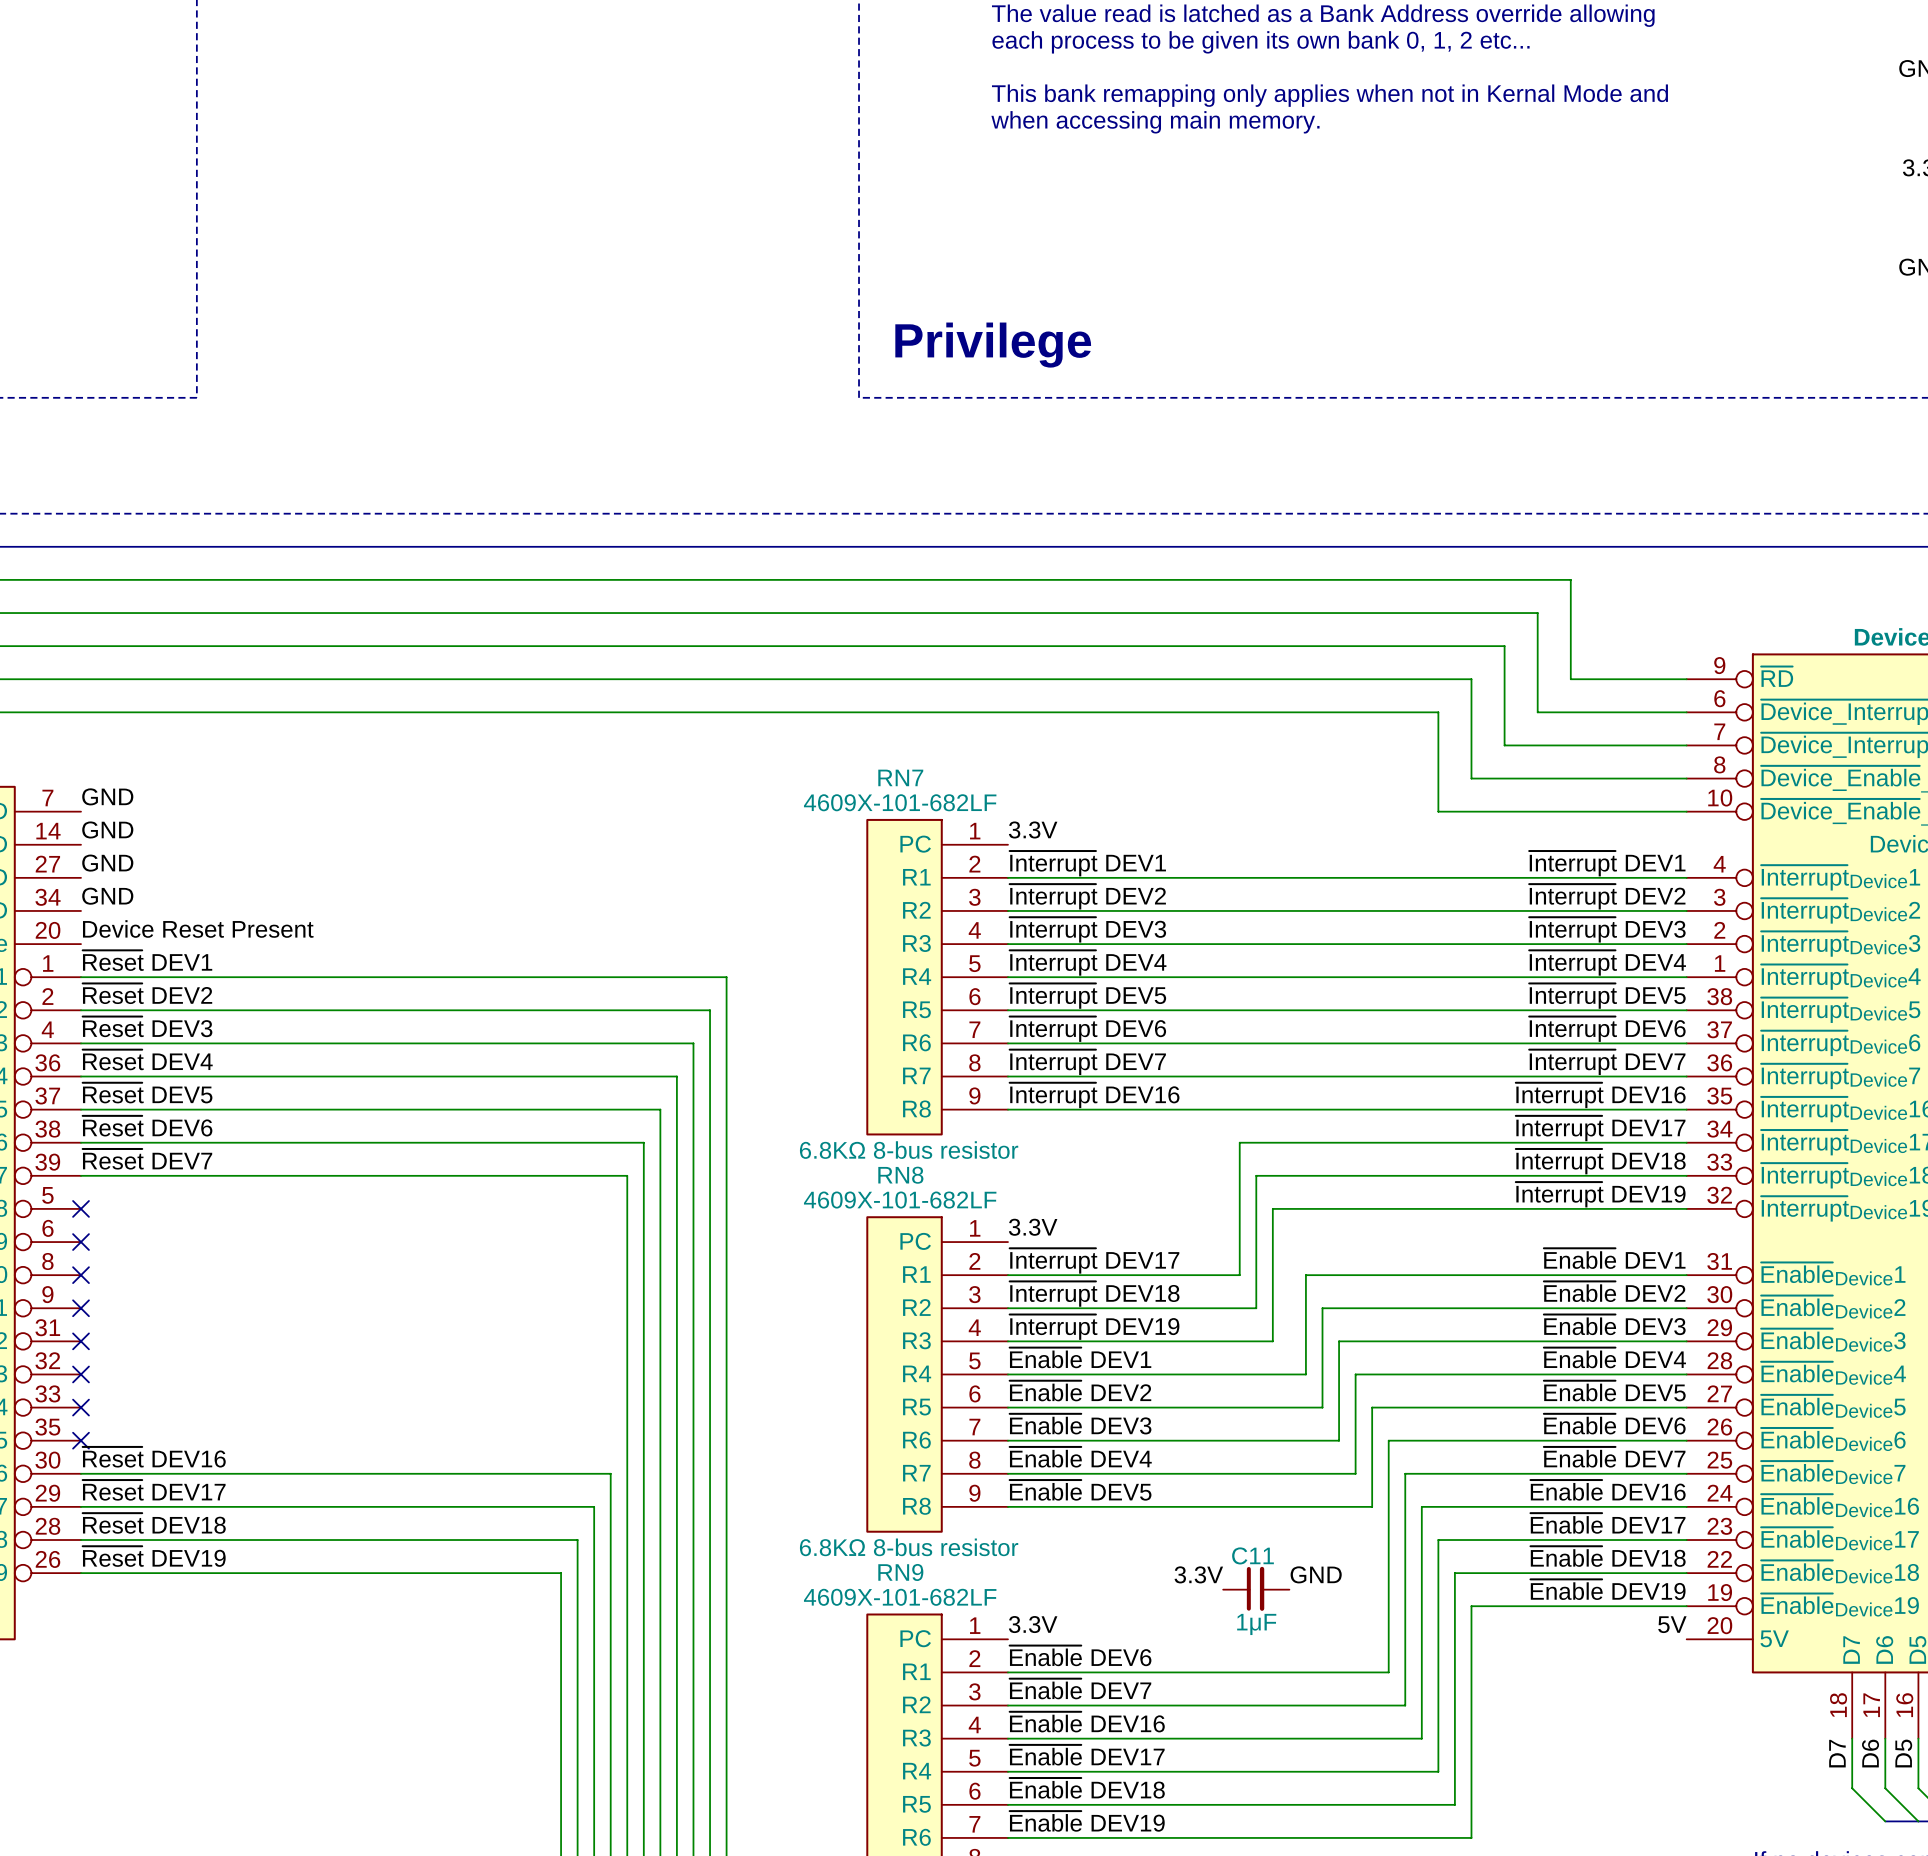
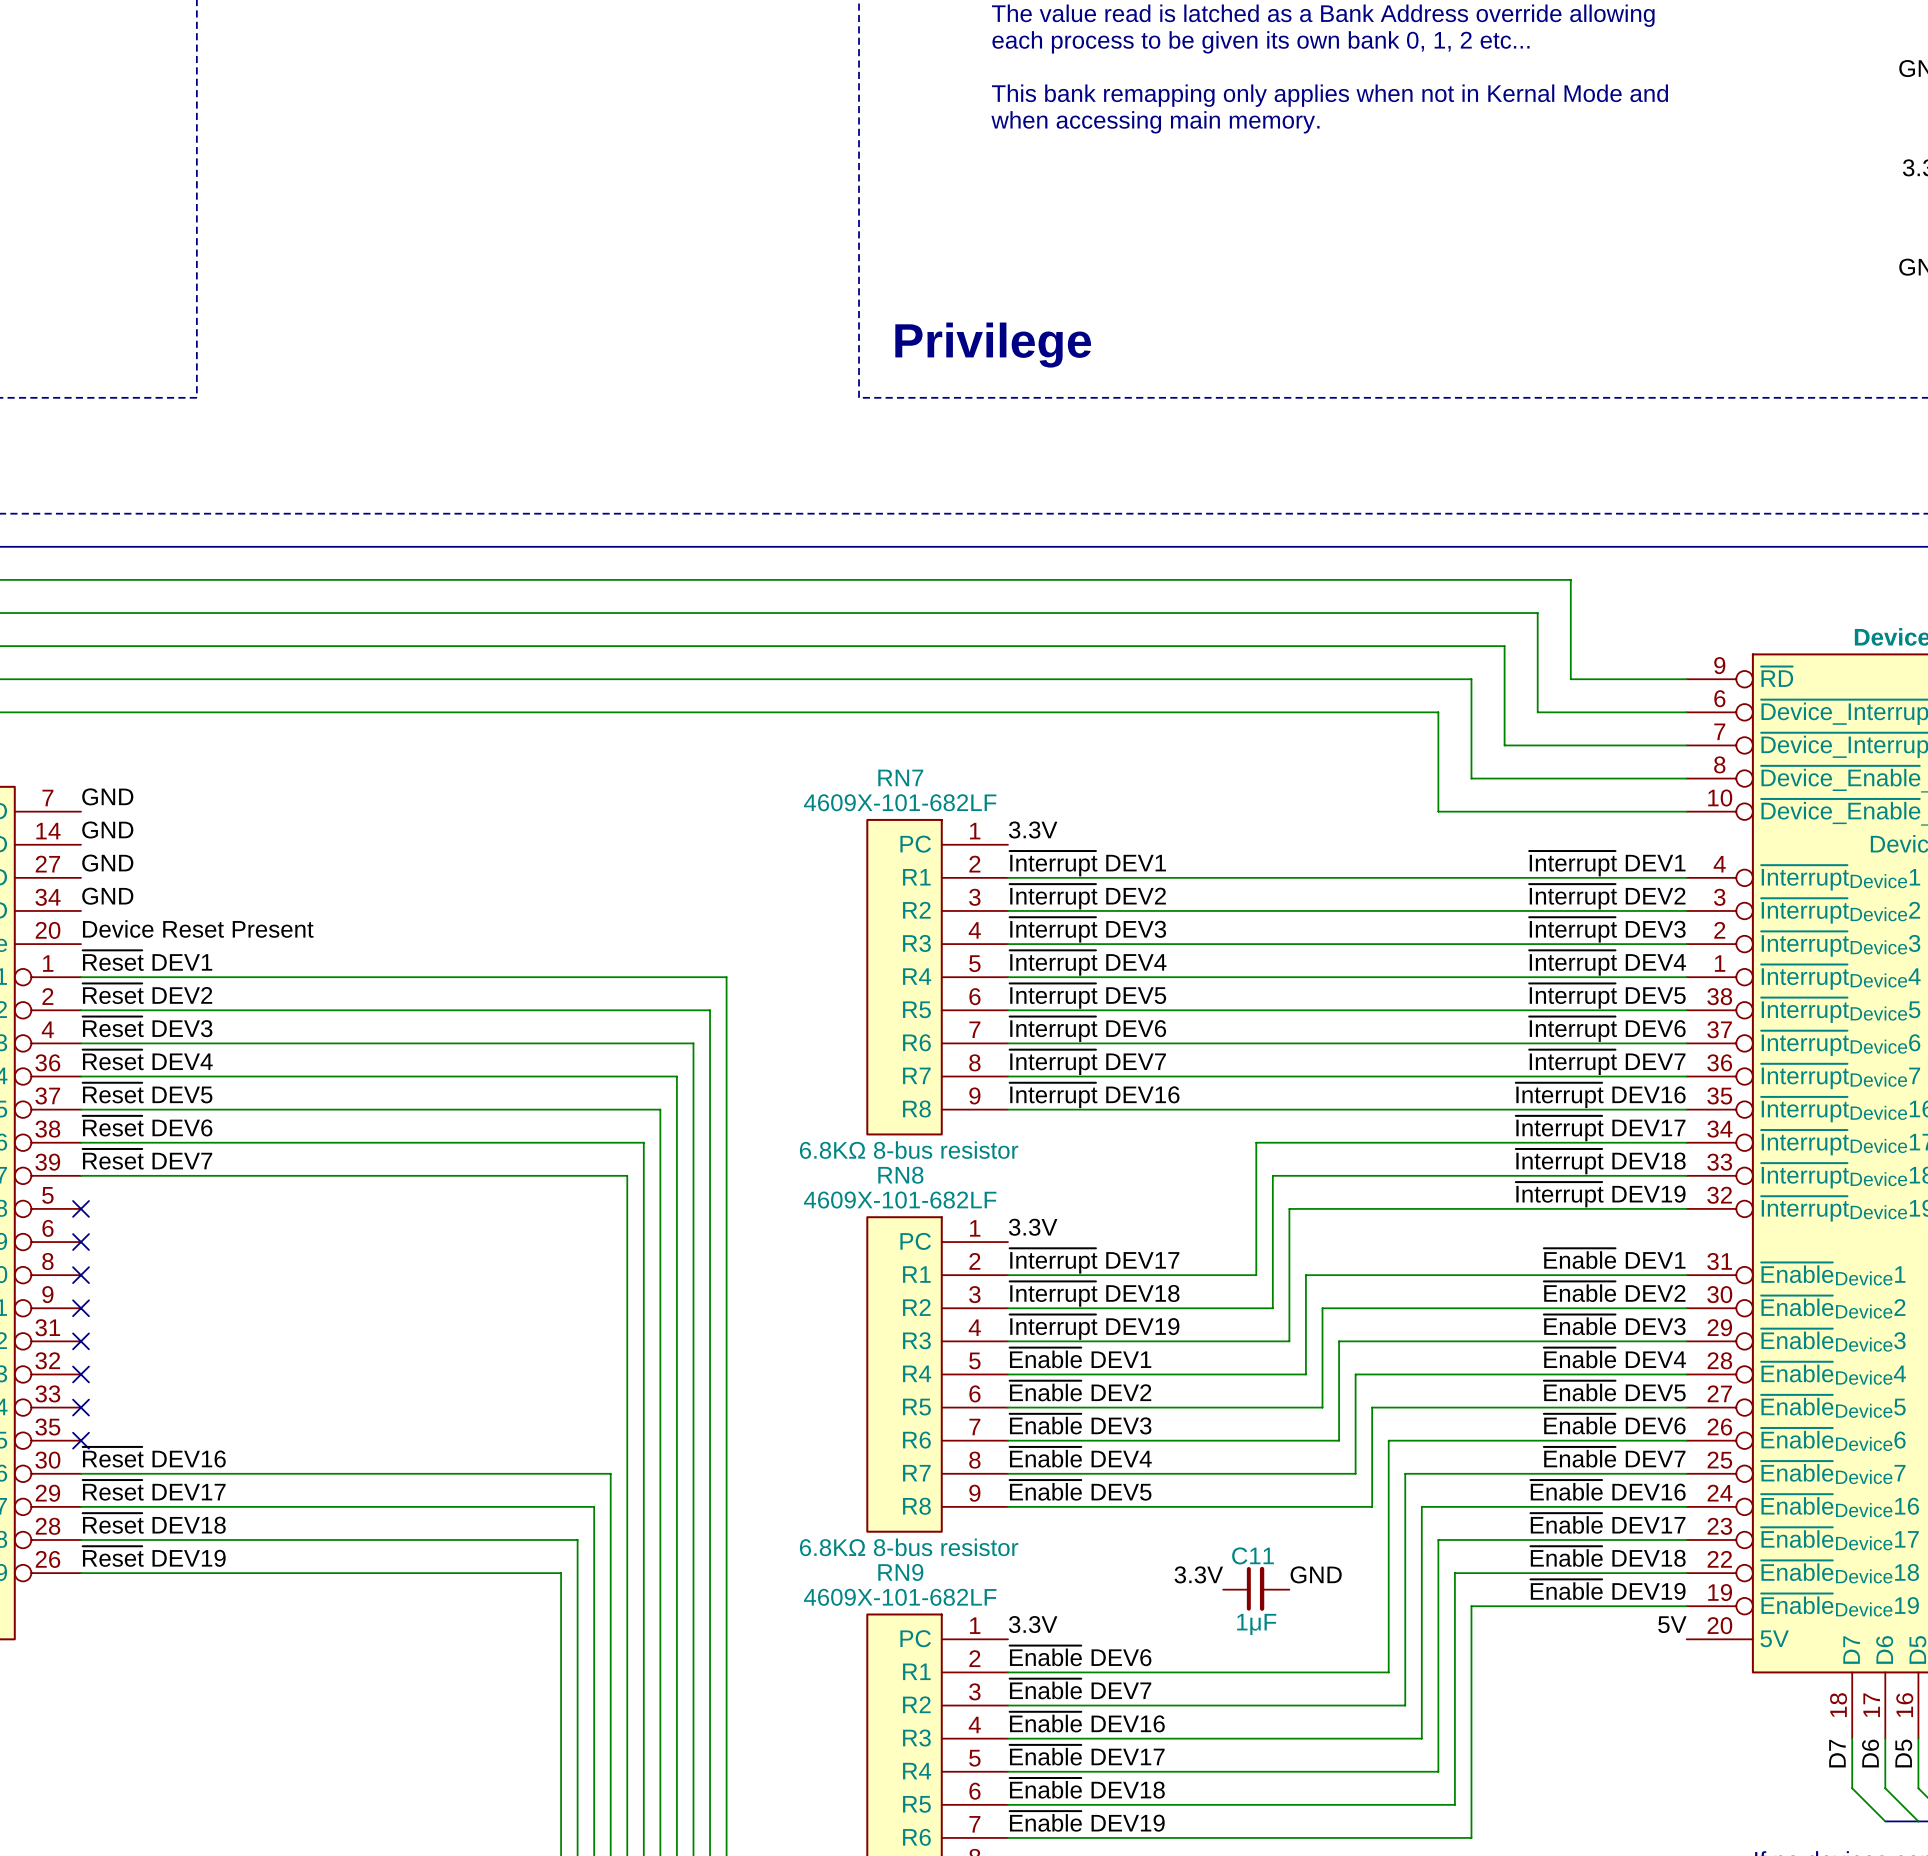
wire: (1256, 1142) (1239, 1142) (1239, 1275) -> none
wire: (1256, 1175) (1272, 1175) -> (1256, 1175) (1256, 1142)
wire: (1272, 1208) (1289, 1208) -> (1272, 1208) (1272, 1175)
wire: none -> (1289, 1208) (1289, 1341) (1272, 1341)
wire: (1256, 1275) (1256, 1308) -> (1256, 1275) (1239, 1275)
wire: (1272, 1308) (1272, 1341) -> (1272, 1308) (1256, 1308)

